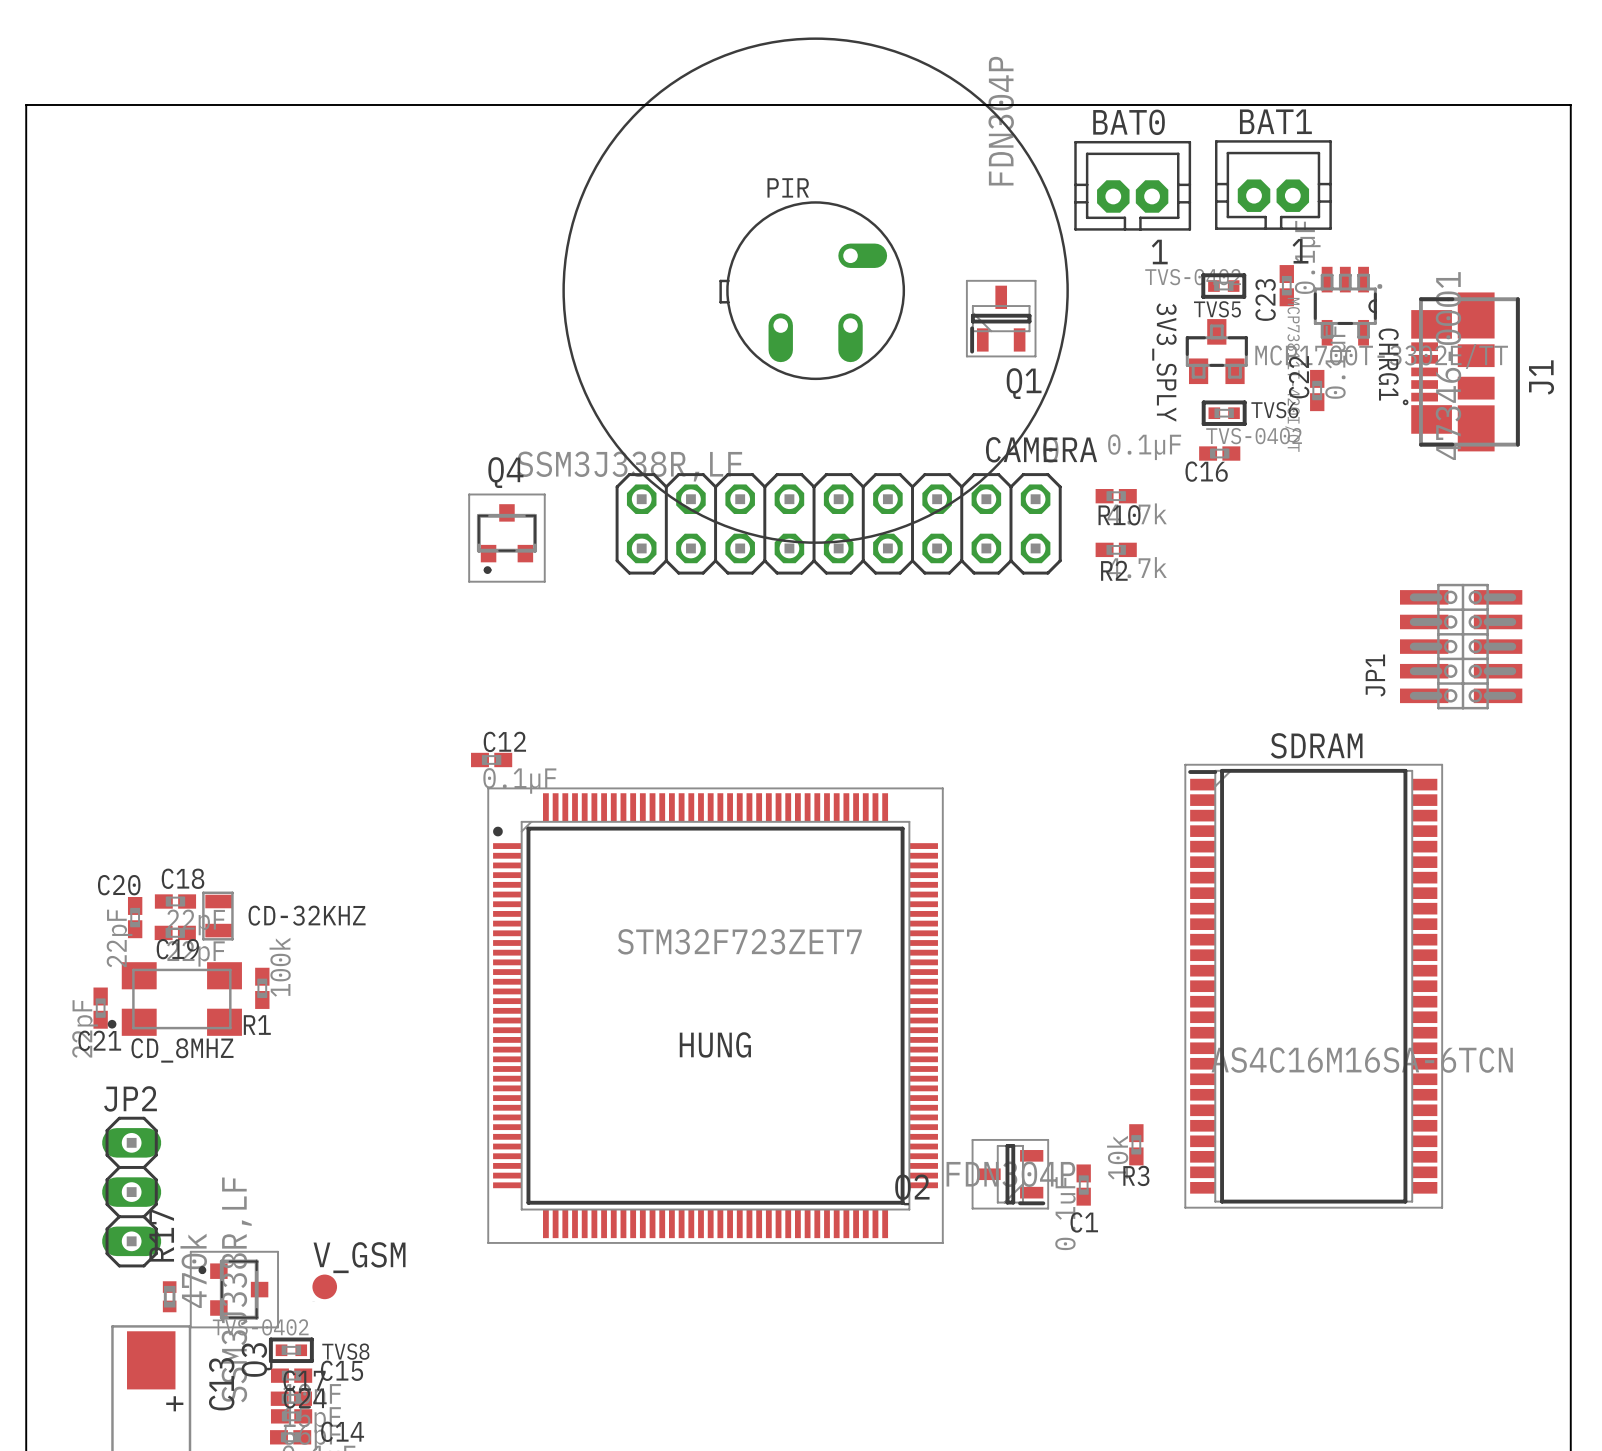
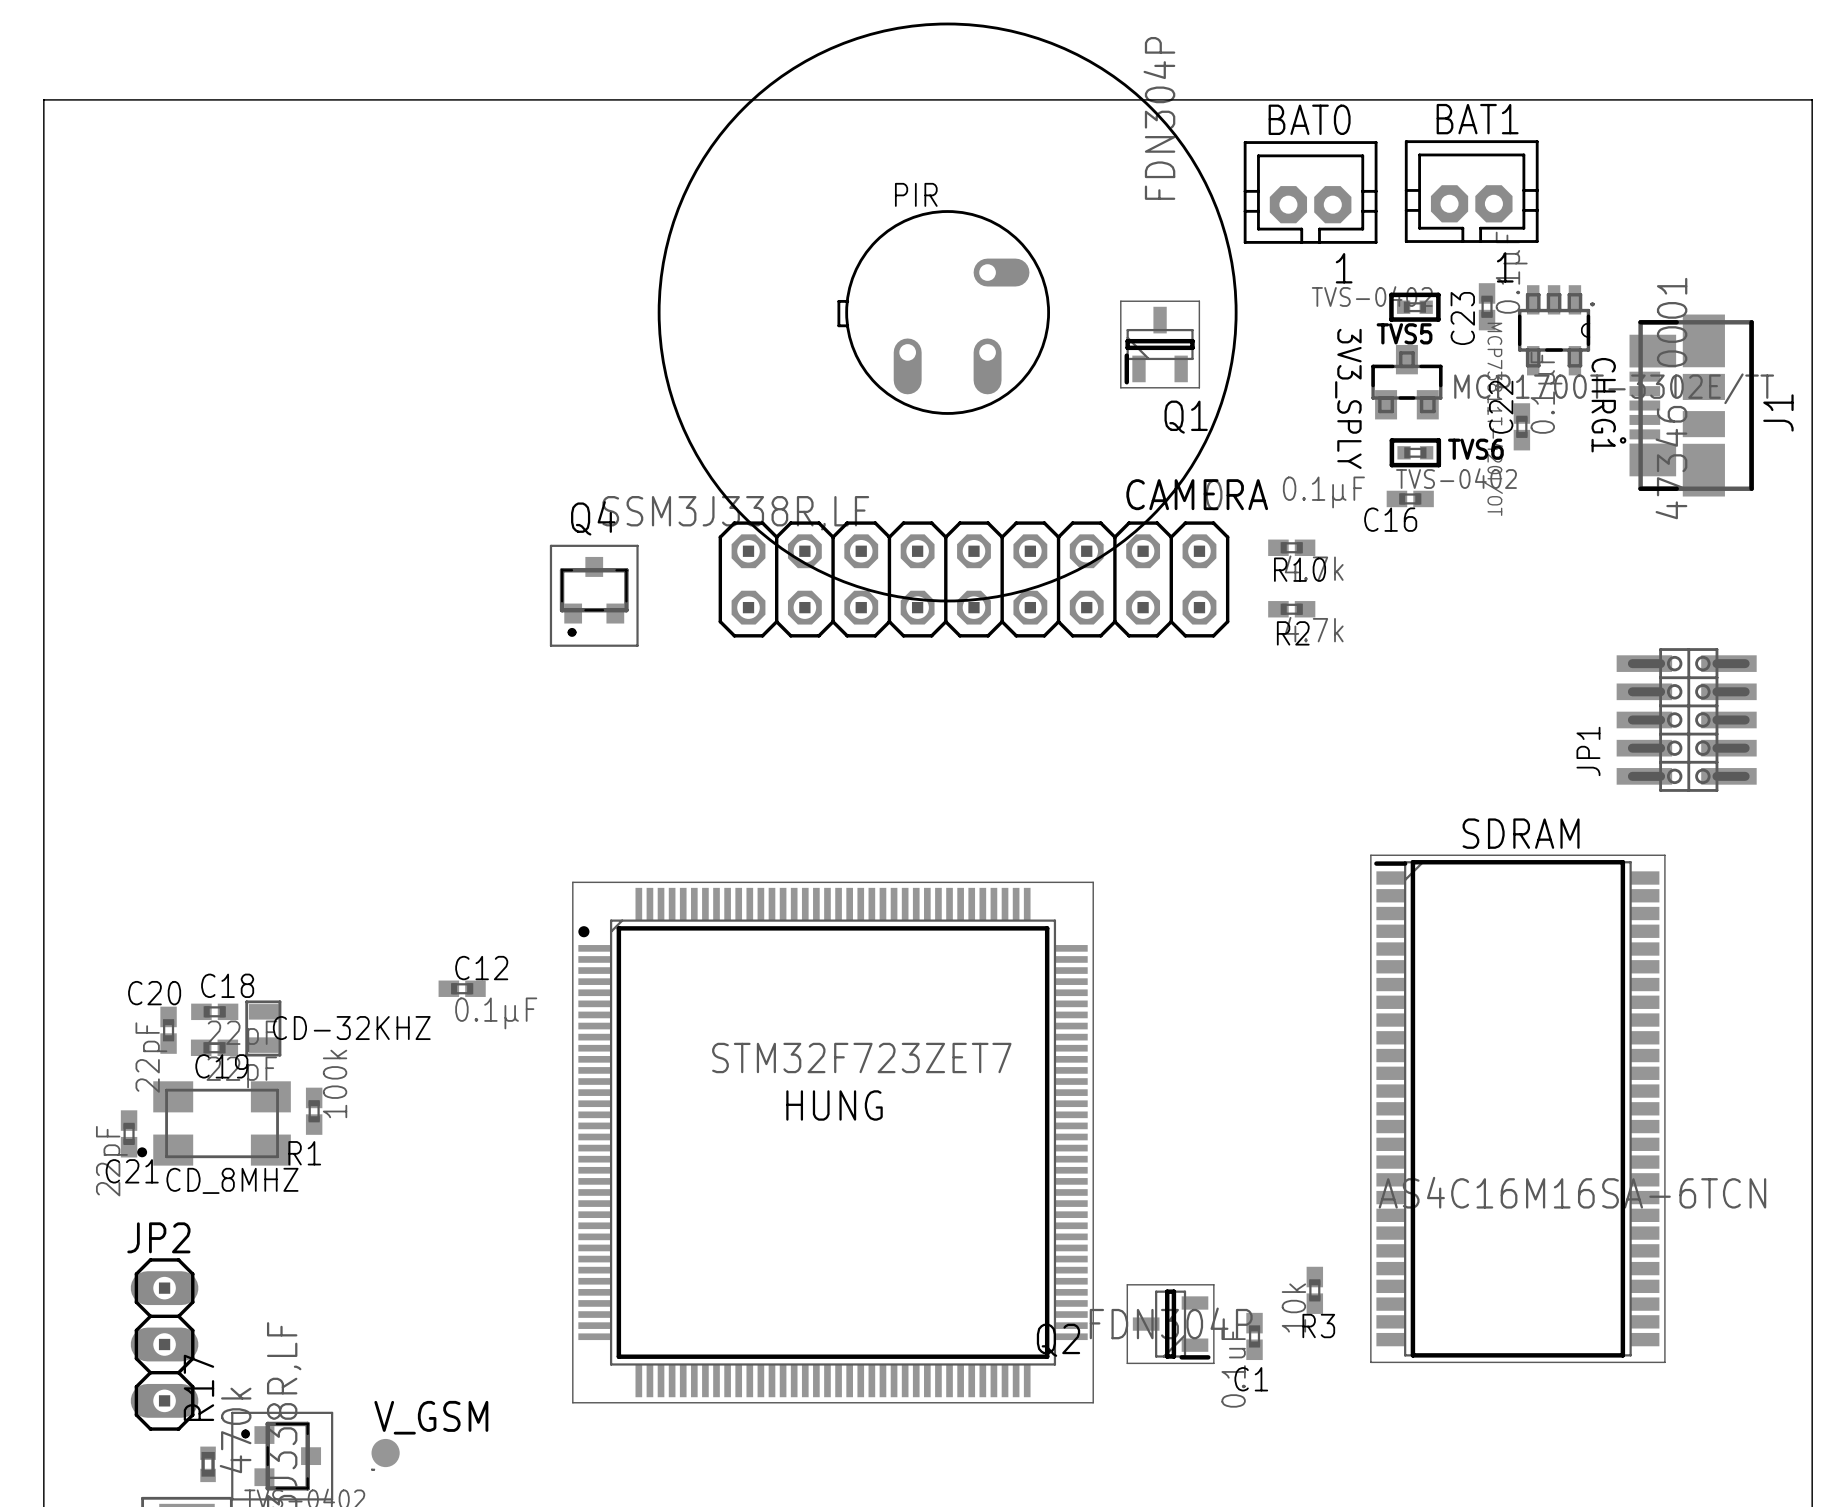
C12 position: (491, 760) -> (462, 988)
HUNG name position: HUNG (715, 1044) -> HUNG (834, 1105)

